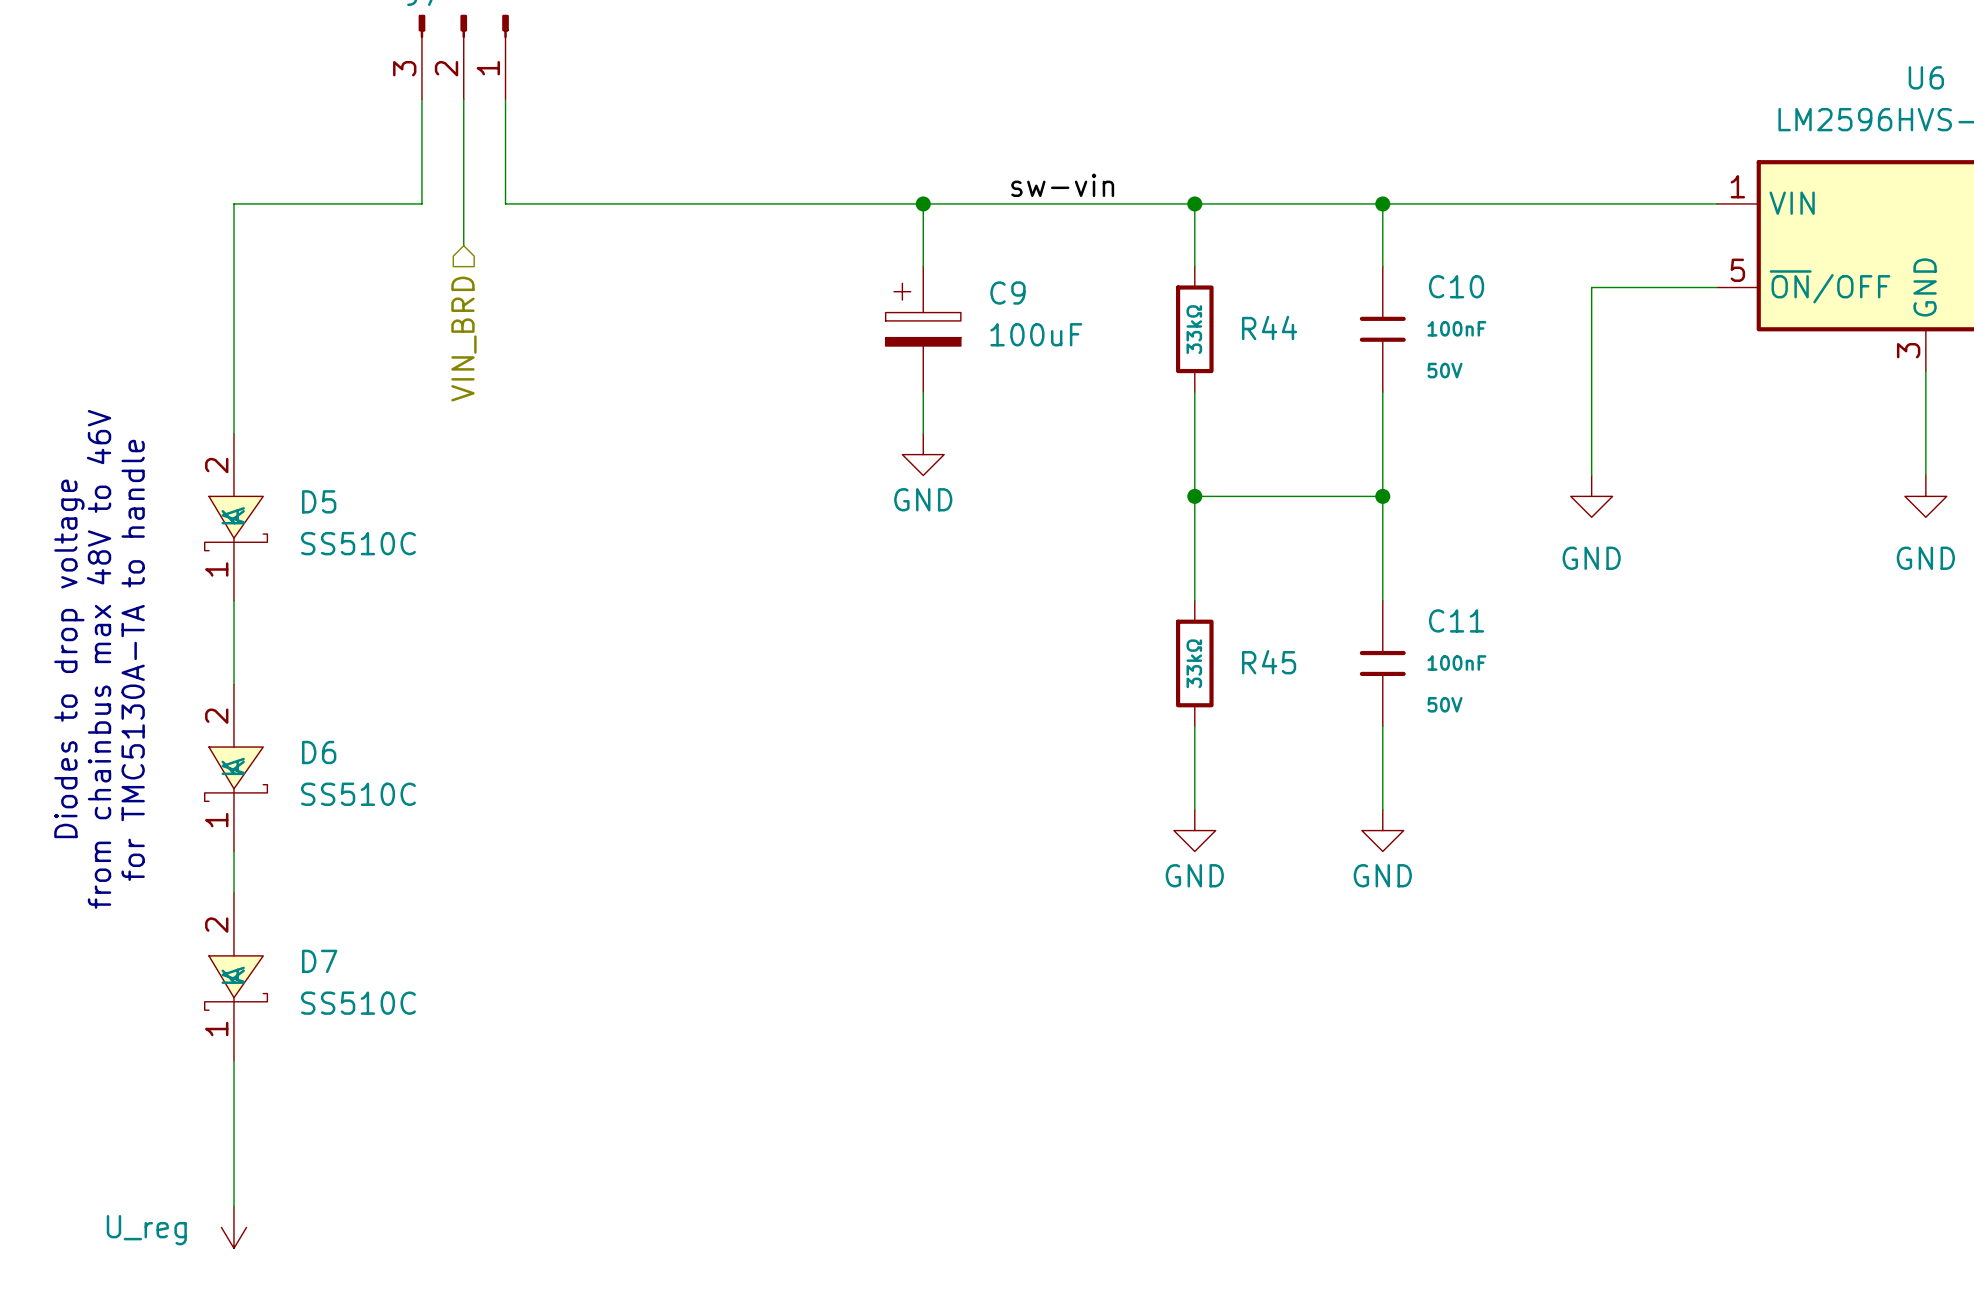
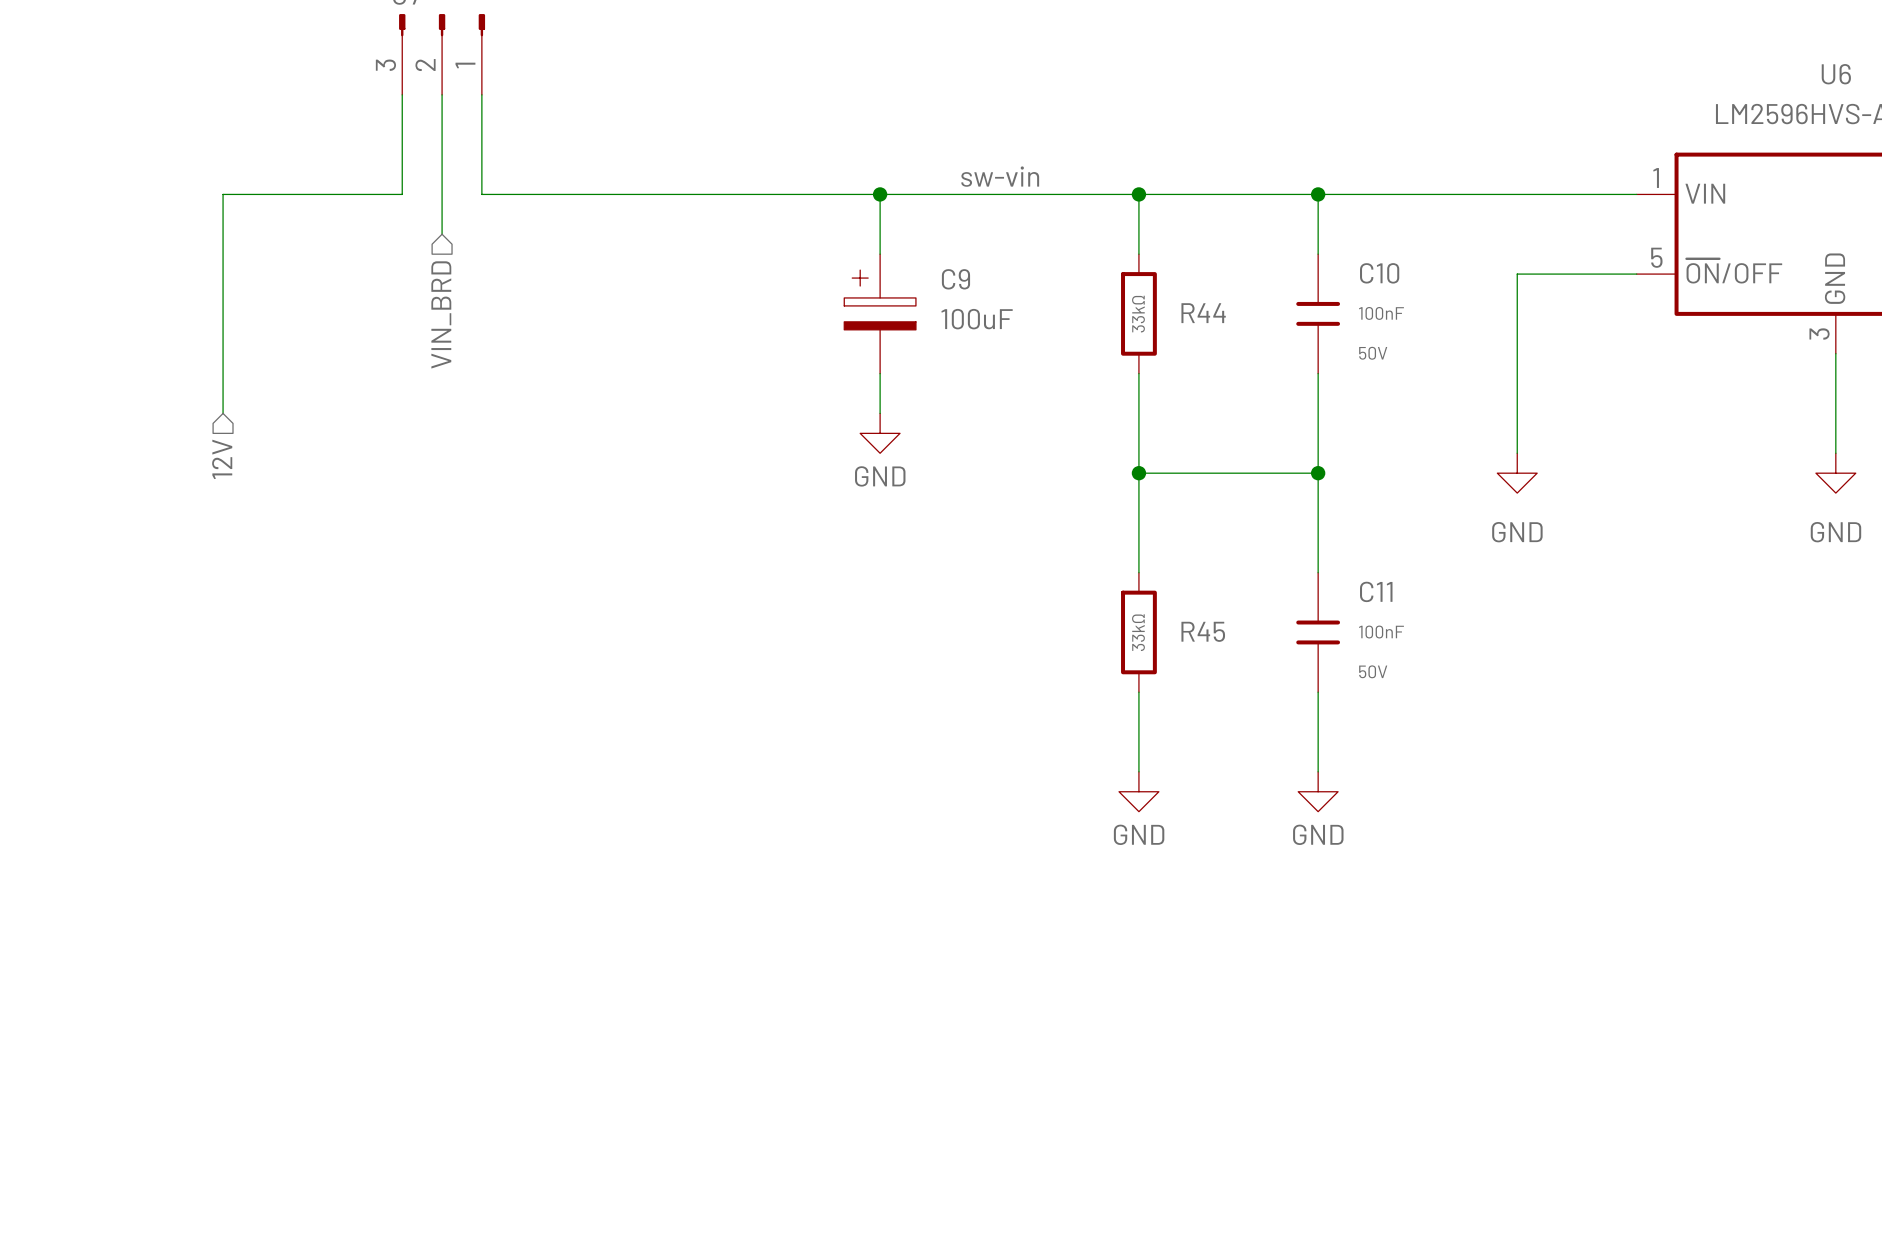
hierarchical label: none -> 12V (222, 459)
D5: SS510C (236, 517) -> none
wire: (233, 600) (233, 684) -> none
text: Diodes to drop voltage (69, 658) -> none
text: from chainbus max 48V to 46V (99, 659) -> none
text: for TMC5130A-TA to handle (133, 660) -> none
D6: SS510C (236, 767) -> none
wire: (233, 851) (233, 893) -> none
D7: SS510C (236, 976) -> none
wire: (233, 1060) (233, 1206) -> none
power symbol: U_reg (233, 1227) -> none

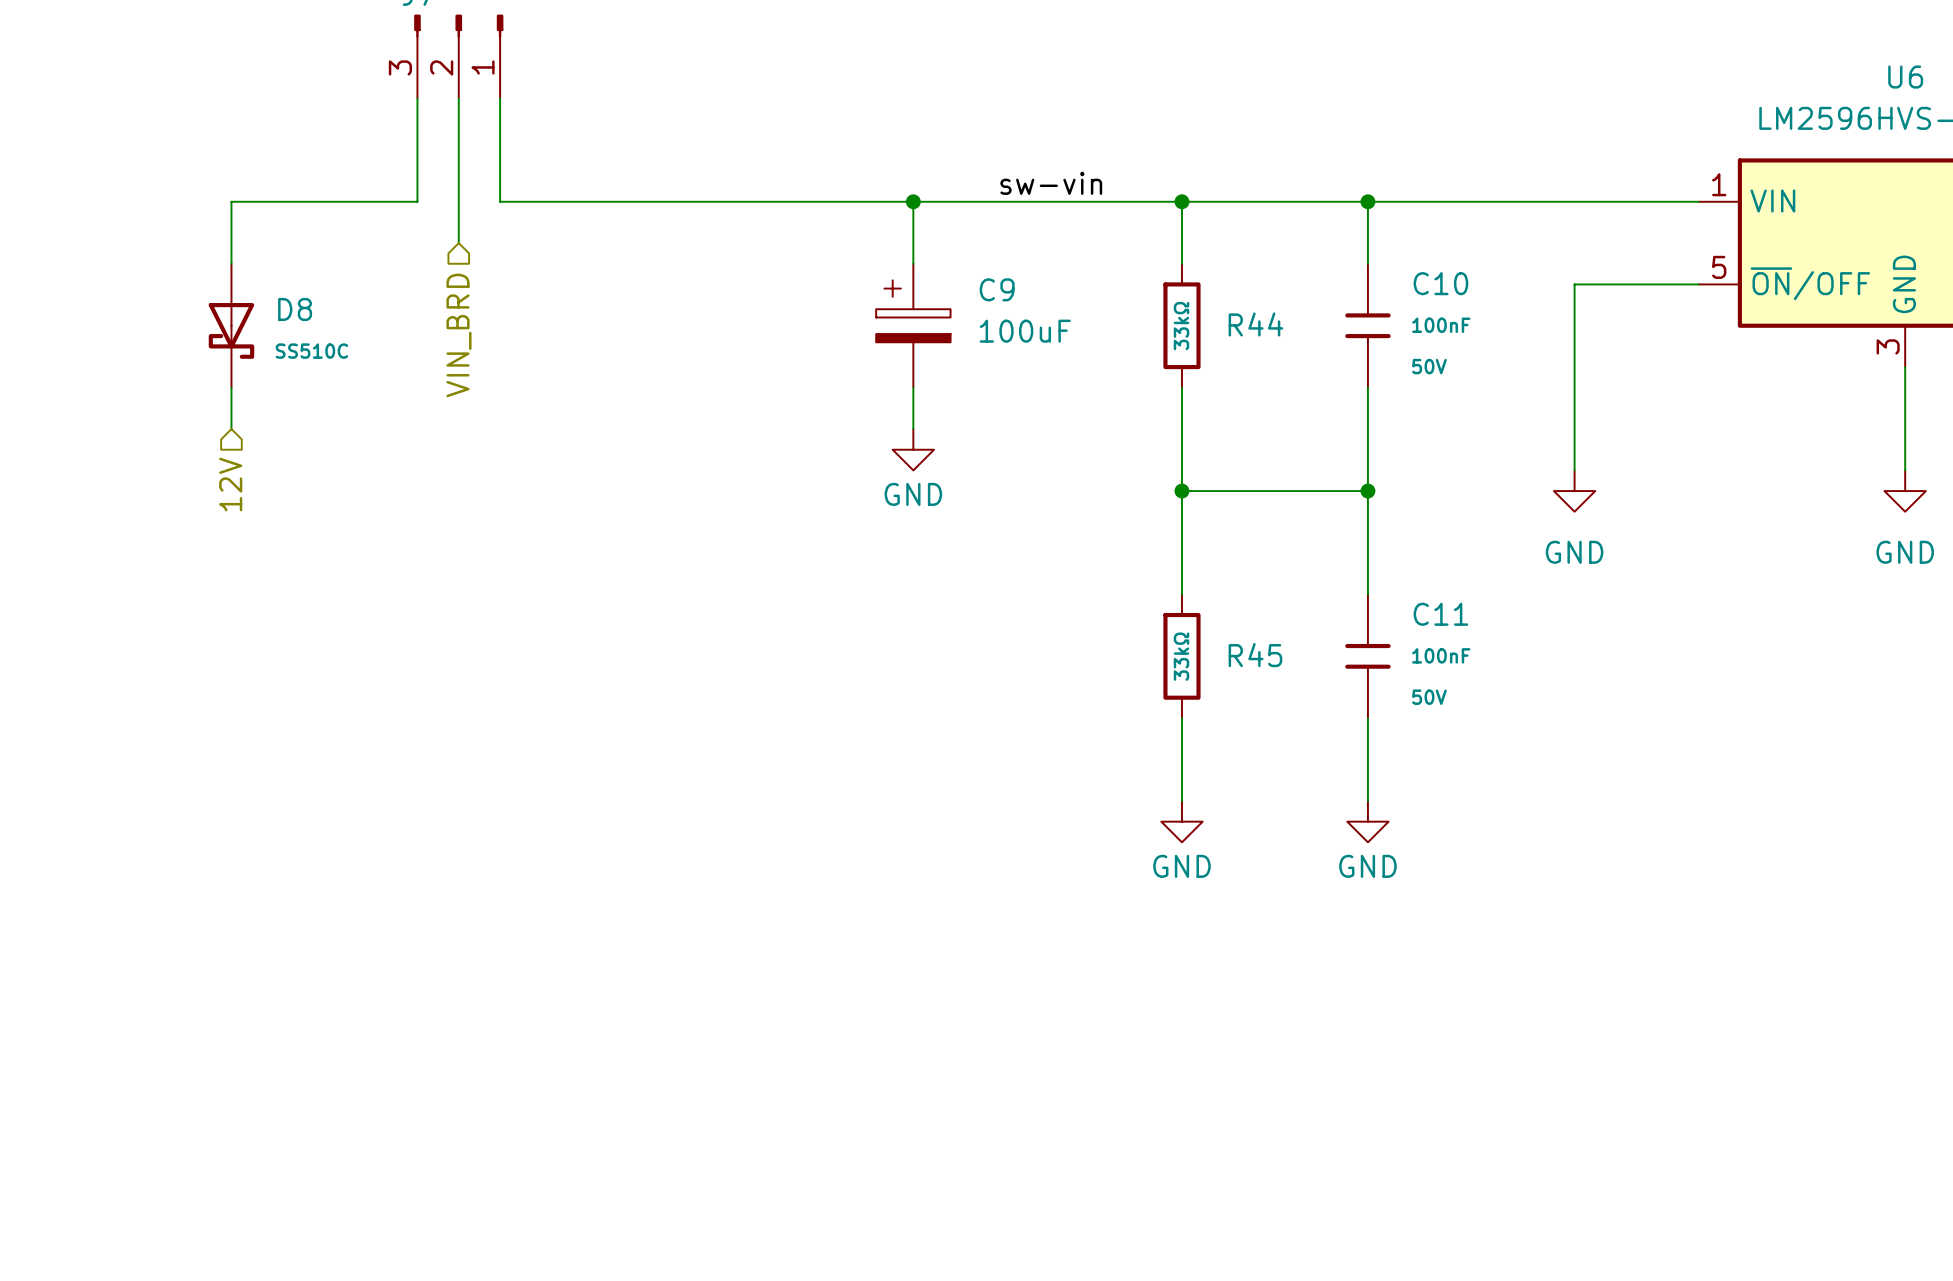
D8: none -> SS510C (231, 325)

